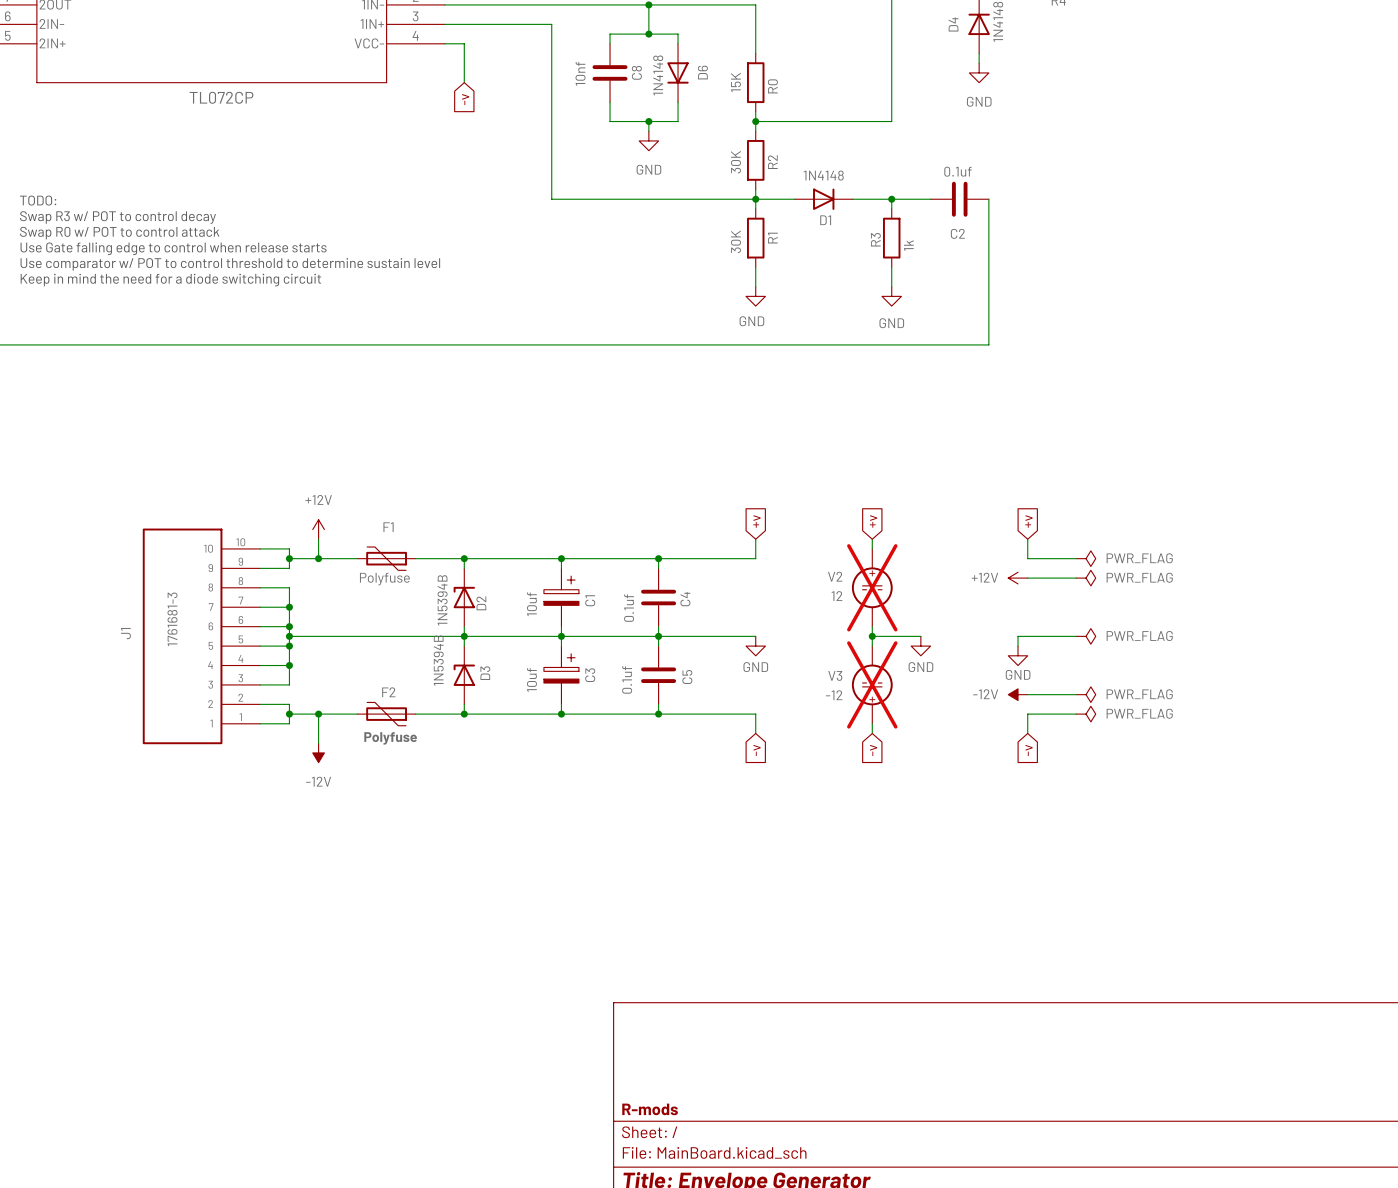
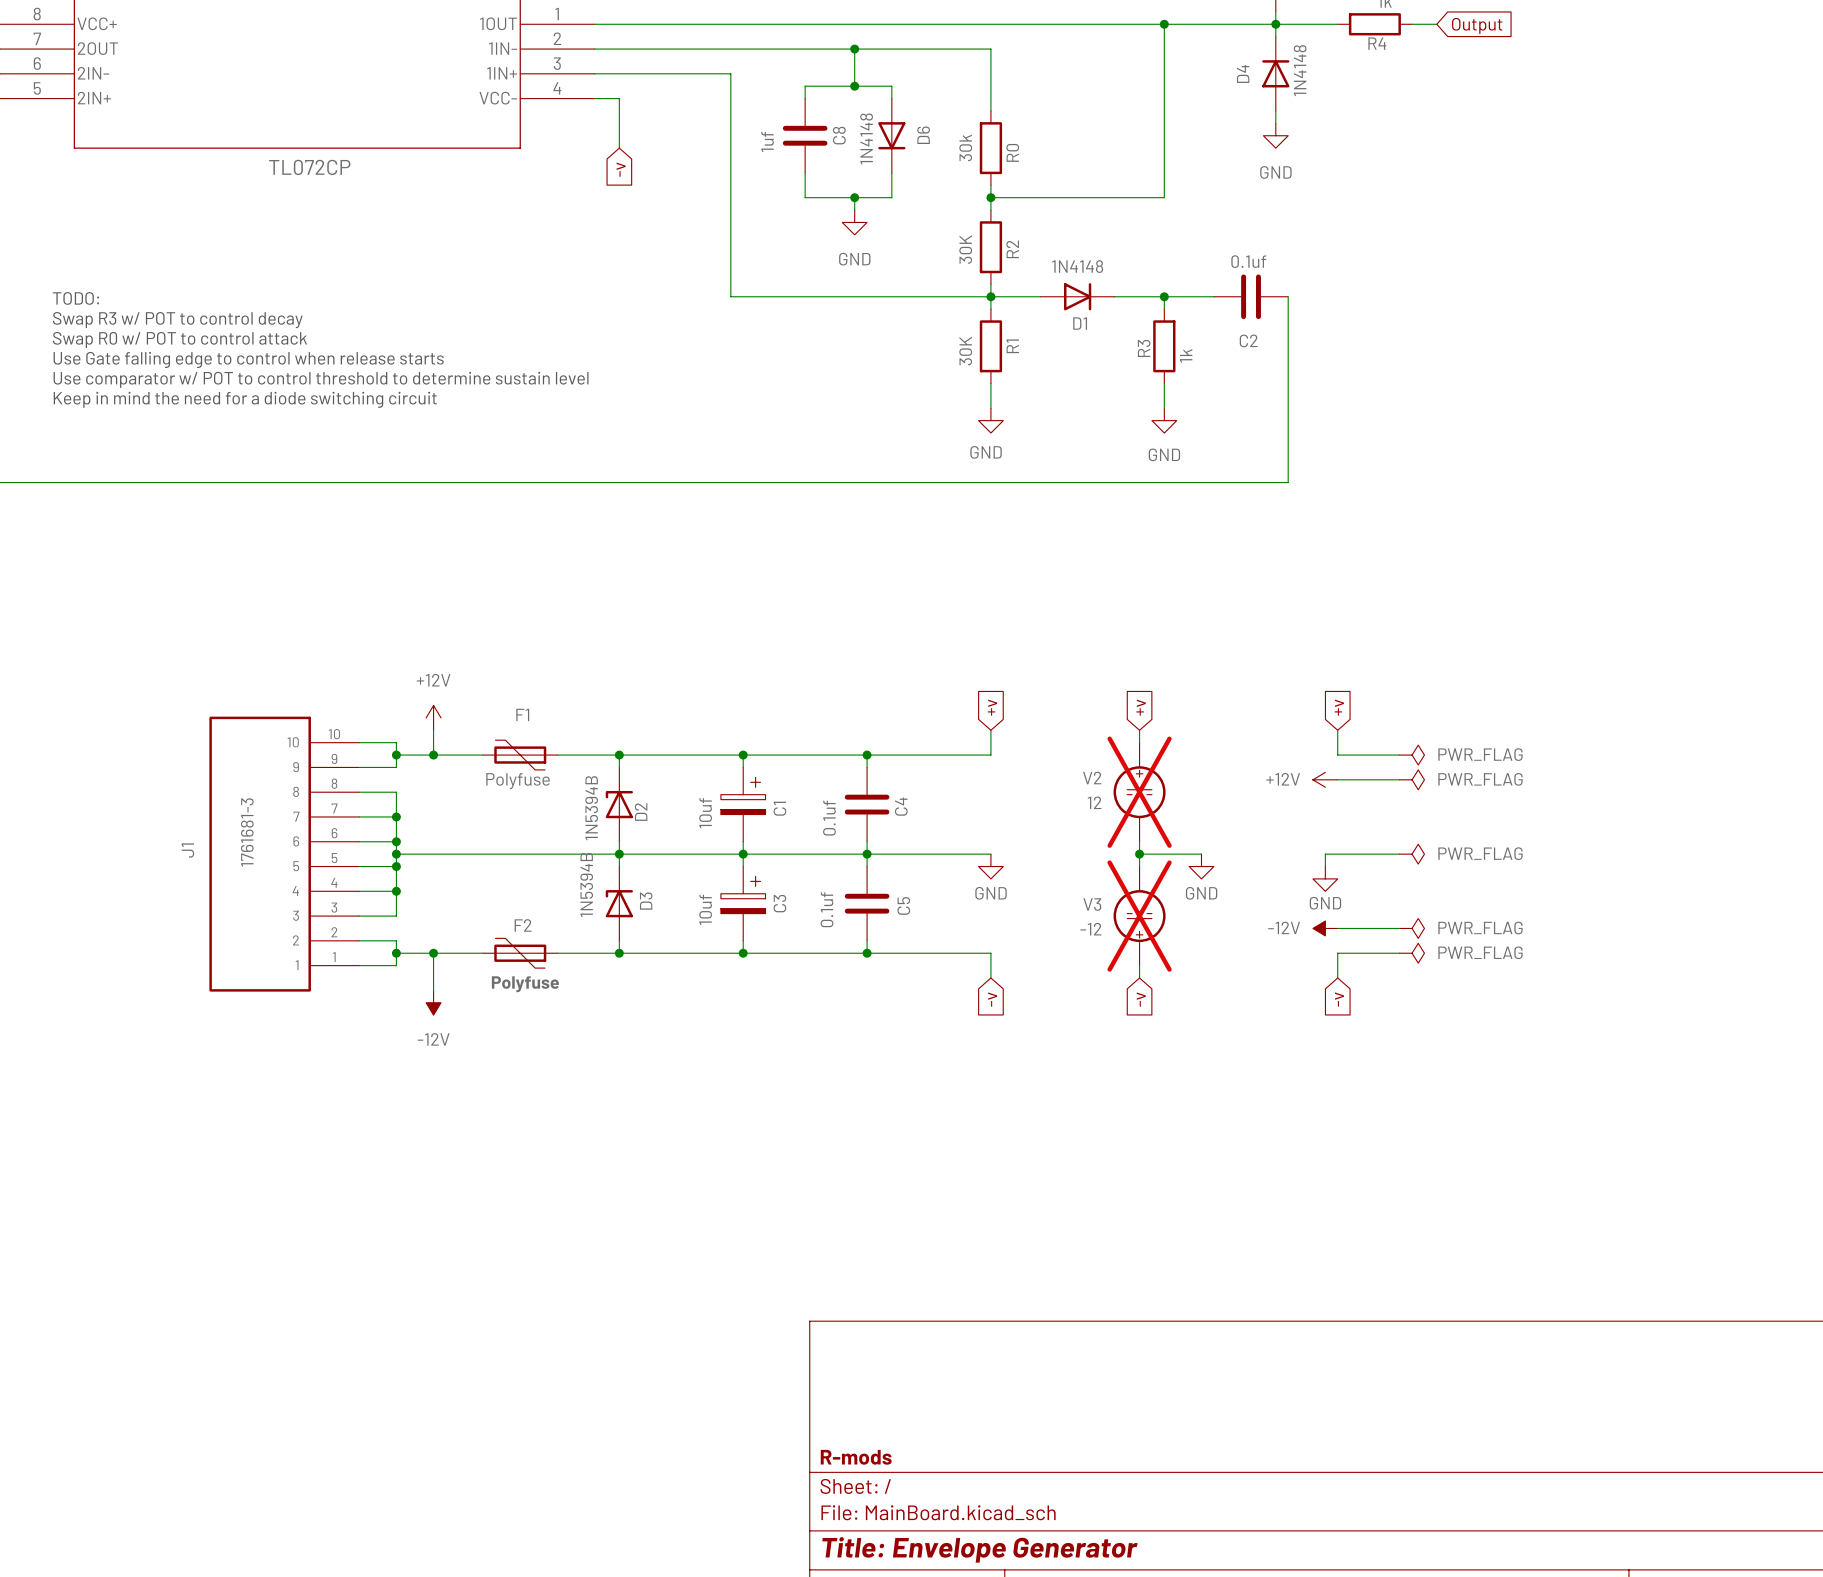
C8 value: 10nf (580, 73) -> 1uf (767, 141)
R0 value: 15K (735, 82) -> 30k (965, 147)

